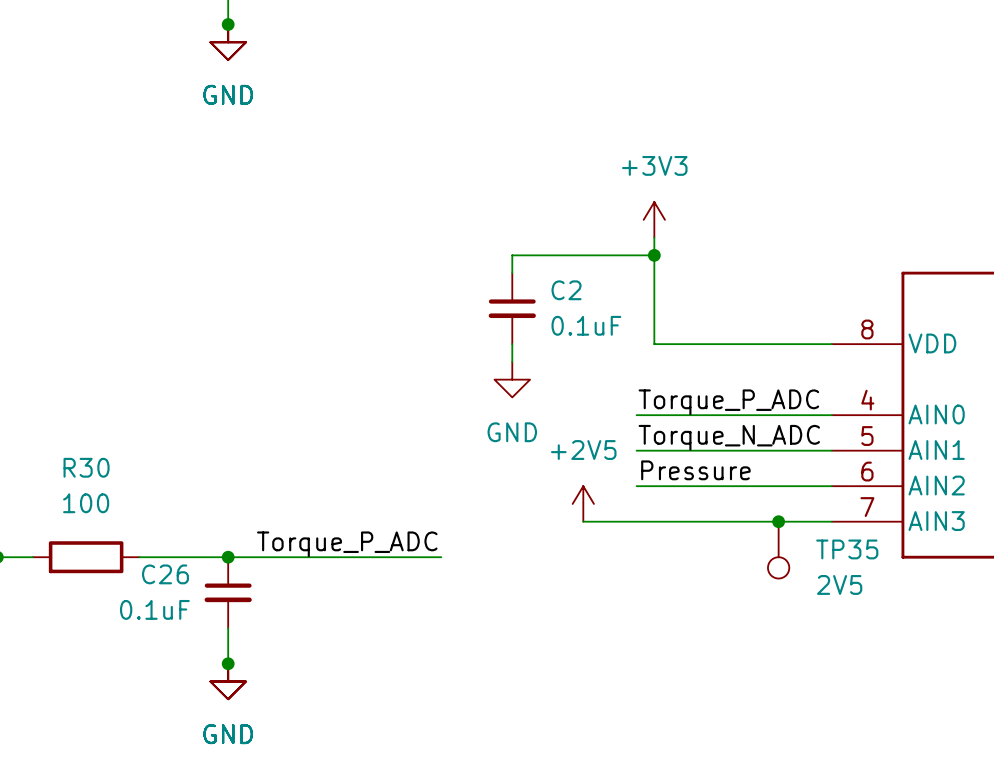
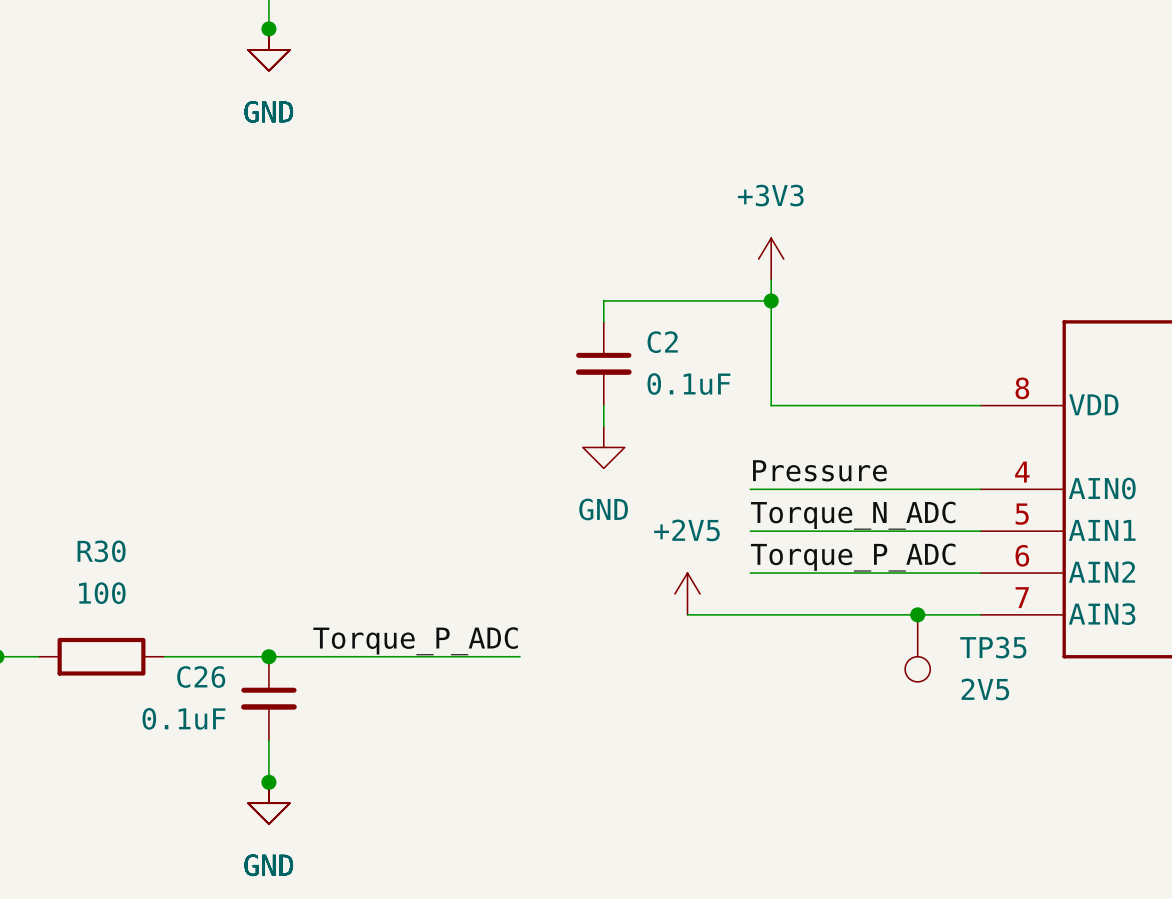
label: Torque_P_ADC (728, 402) -> Pressure (819, 470)
label: Pressure (695, 470) -> Torque_P_ADC (853, 557)

